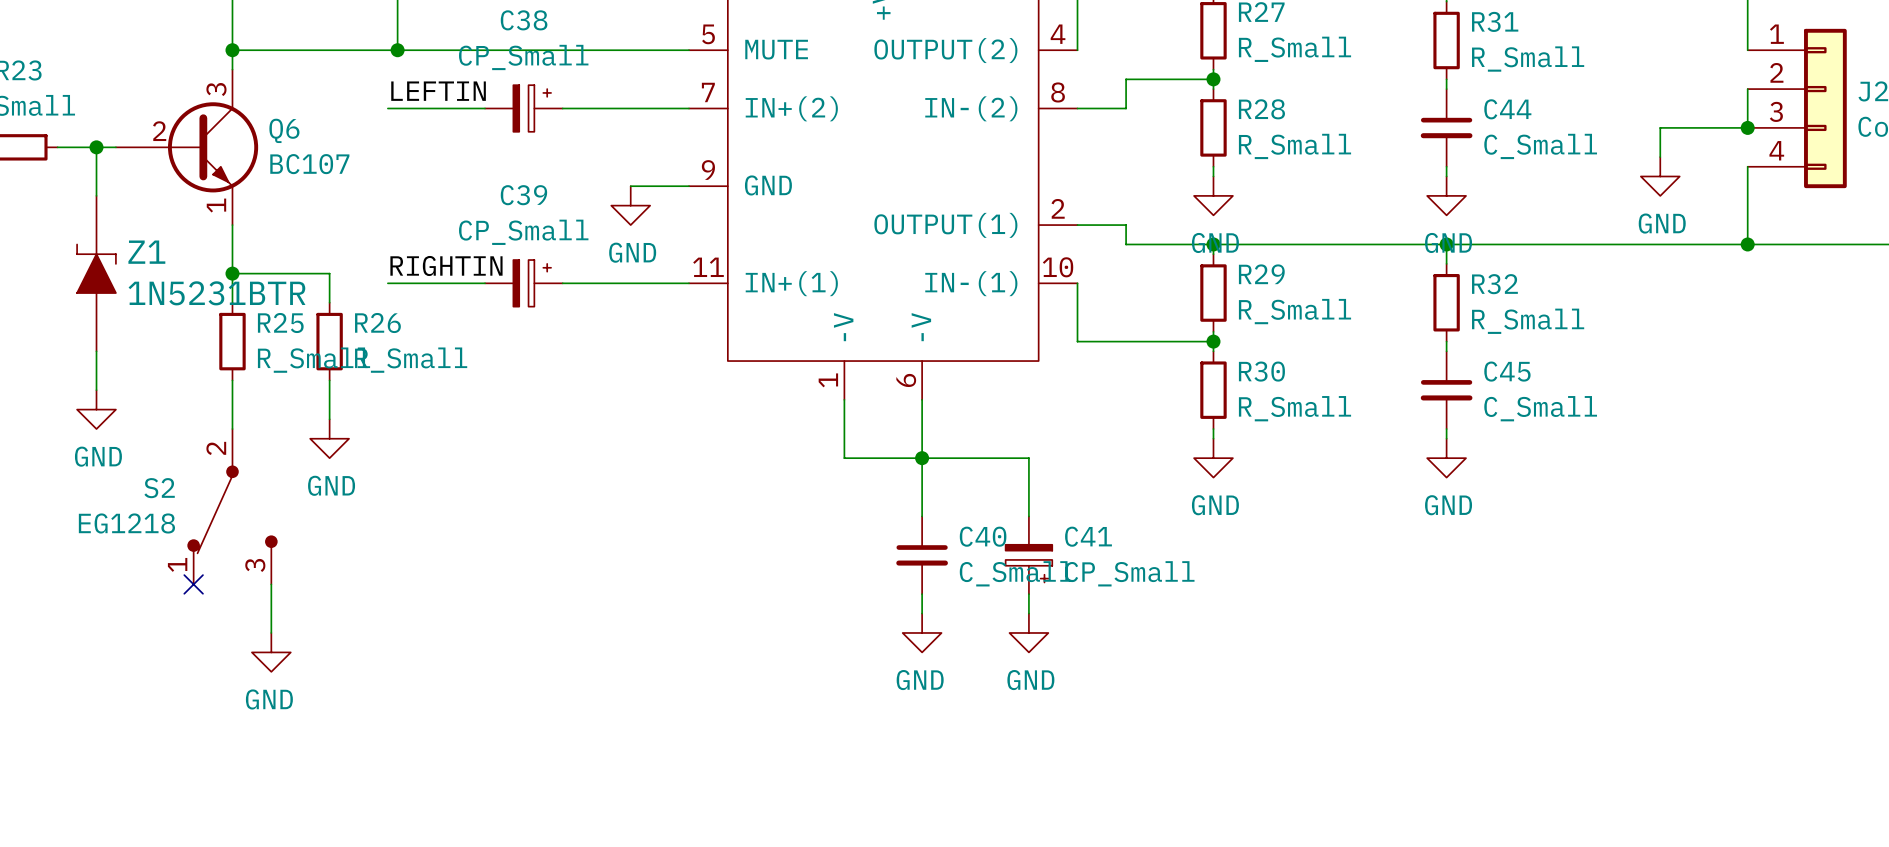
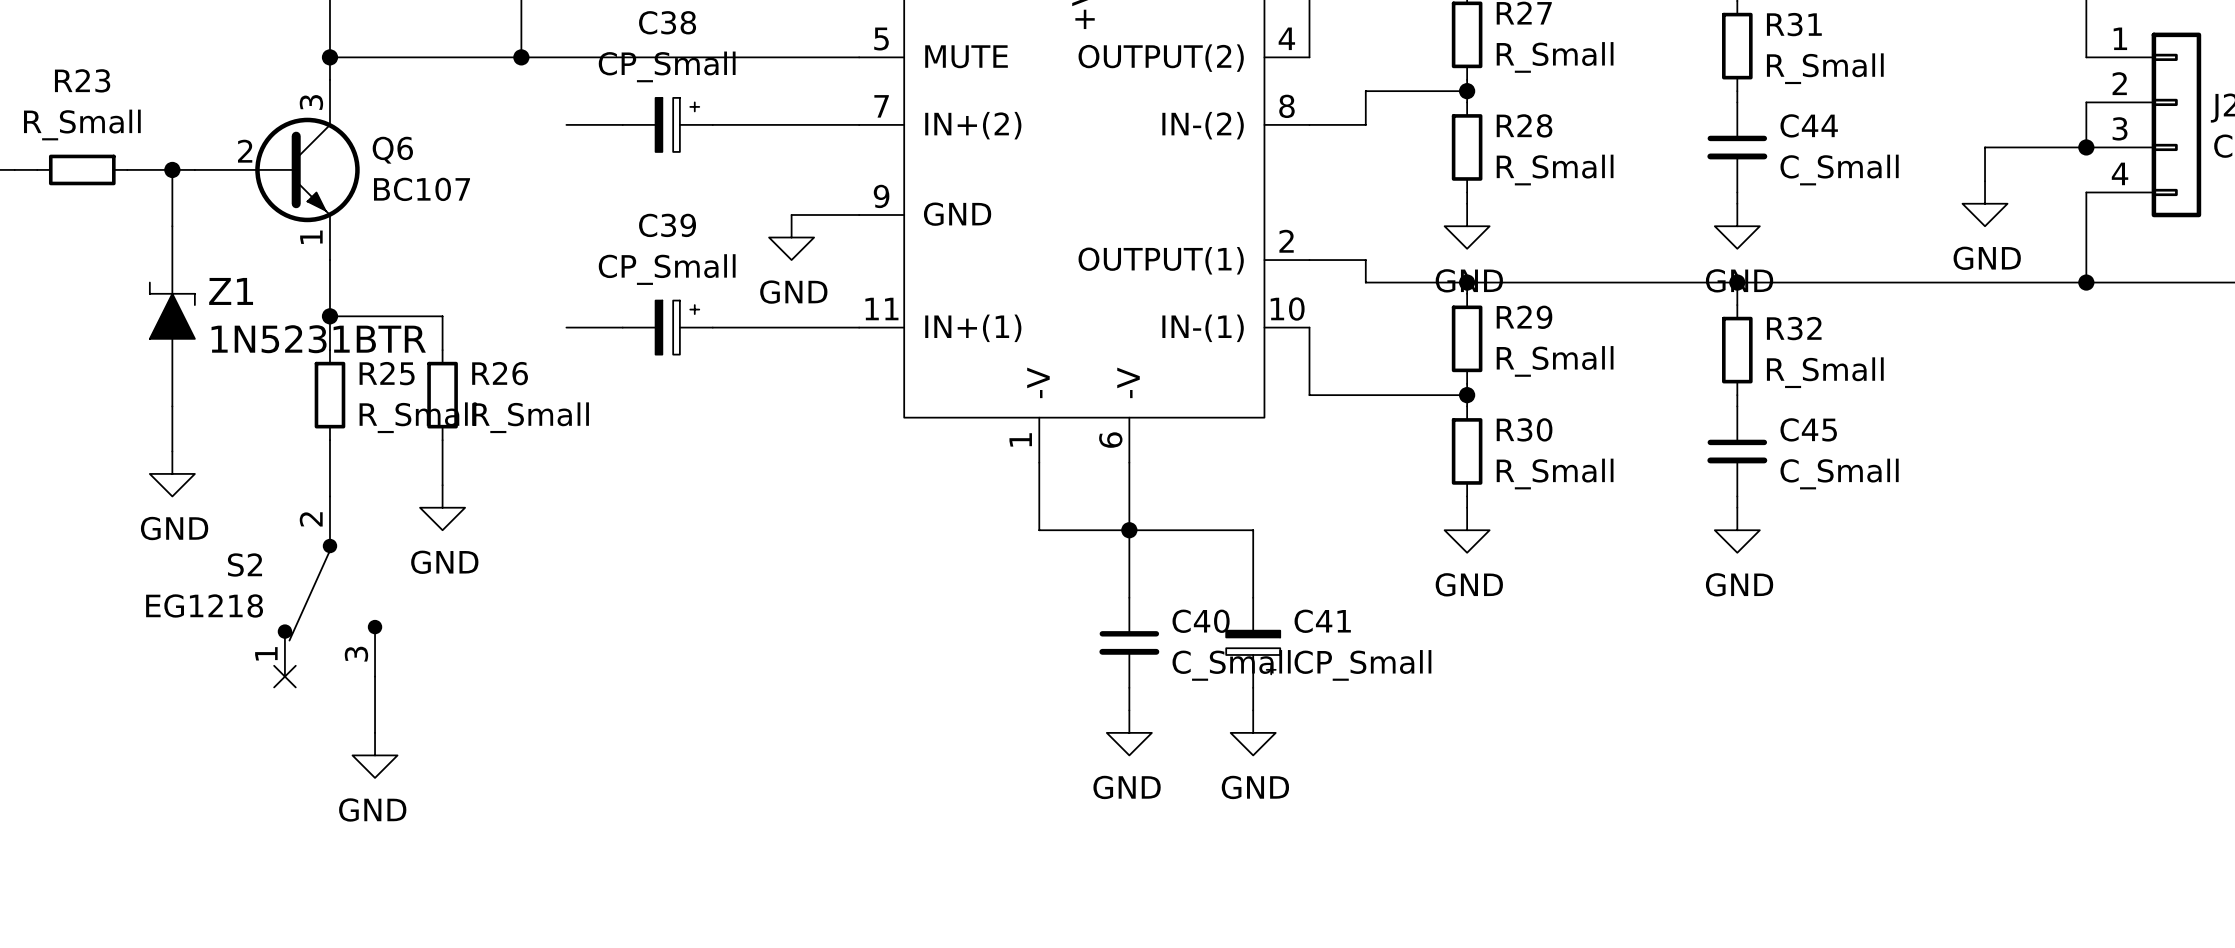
label: LEFTIN (438, 91) -> none
wire: (387, 108) (436, 108) -> none
label: RIGHTIN (446, 265) -> none
wire: (387, 283) (436, 283) -> none

